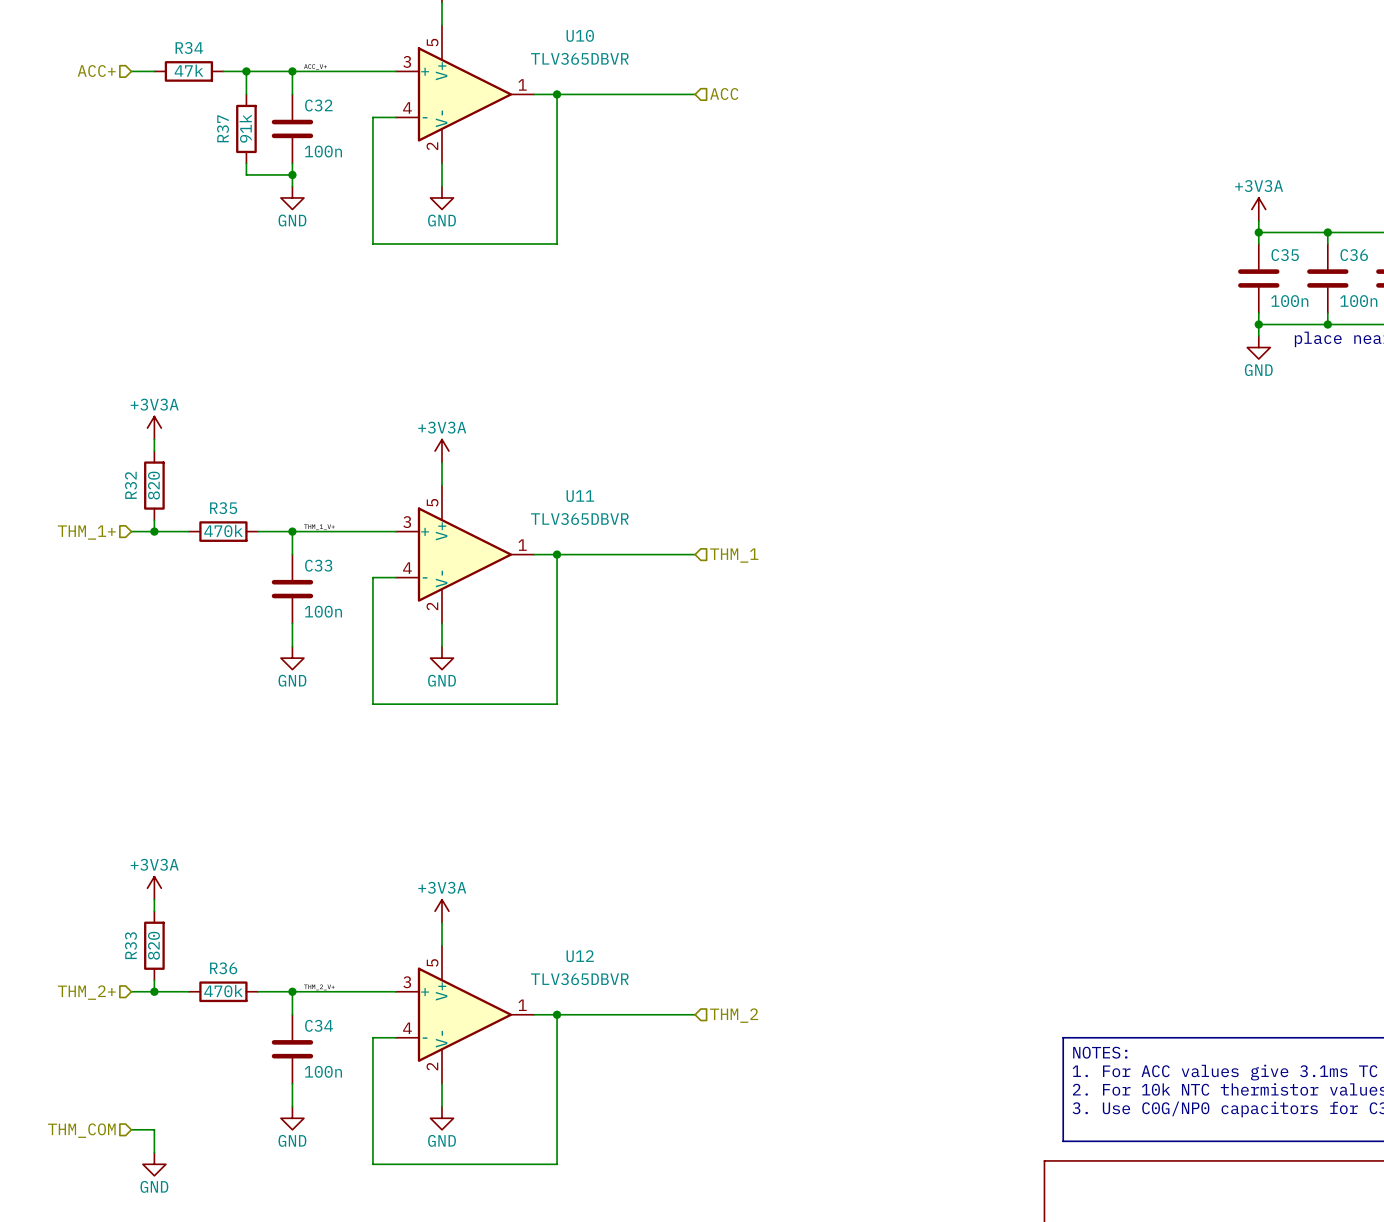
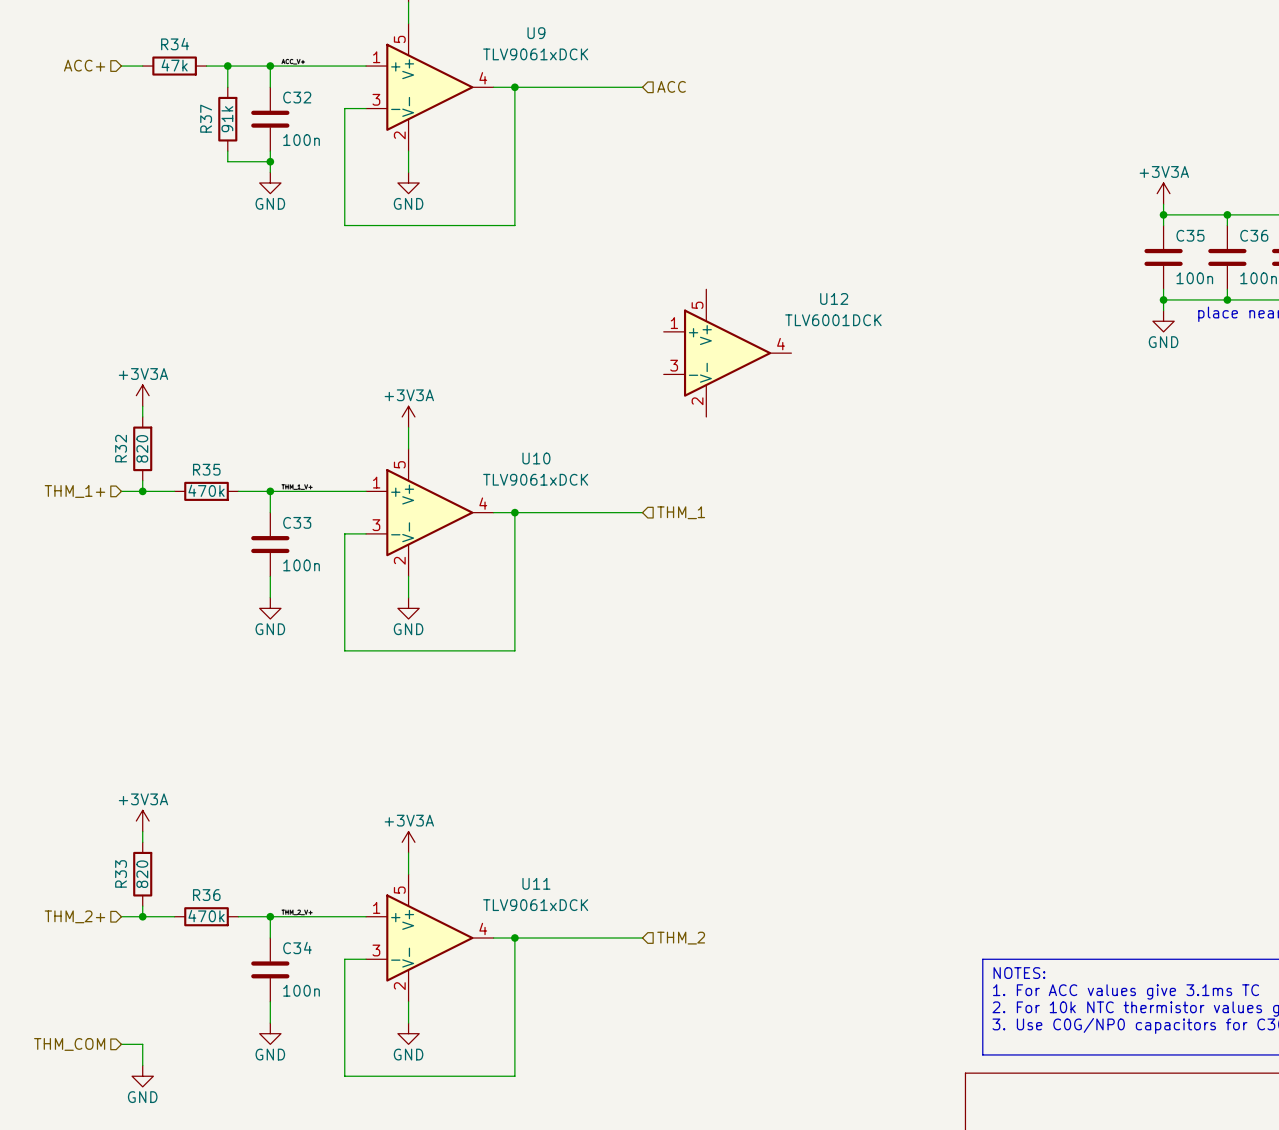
U10 value: TLV365DBVR (579, 58) -> TLV9061xDCK (535, 479)
U10 pin number: 3 (407, 61) -> 1 (376, 482)
U10 pin number: 1 (522, 84) -> 4 (483, 503)
U10 position: (465, 94) -> (429, 512)
U9: none -> TLV9061xDCK (429, 87)
U10 pin number: 4 (407, 107) -> 3 (376, 525)
U11 value: TLV365DBVR (579, 519) -> TLV9061xDCK (535, 905)
U11 pin number: 3 (407, 522) -> 1 (376, 907)
U11 pin number: 1 (522, 545) -> 4 (483, 928)
U11 position: (465, 554) -> (429, 938)
U11 pin number: 4 (407, 568) -> 3 (376, 950)
U12 value: TLV365DBVR (579, 979) -> TLV6001DCK (833, 320)
U12 pin number: 3 (407, 982) -> 1 (674, 323)
U12 pin number: 1 (522, 1005) -> 4 (781, 344)
U12 position: (465, 1014) -> (727, 353)
U12 pin number: 4 (407, 1028) -> 3 (674, 365)

